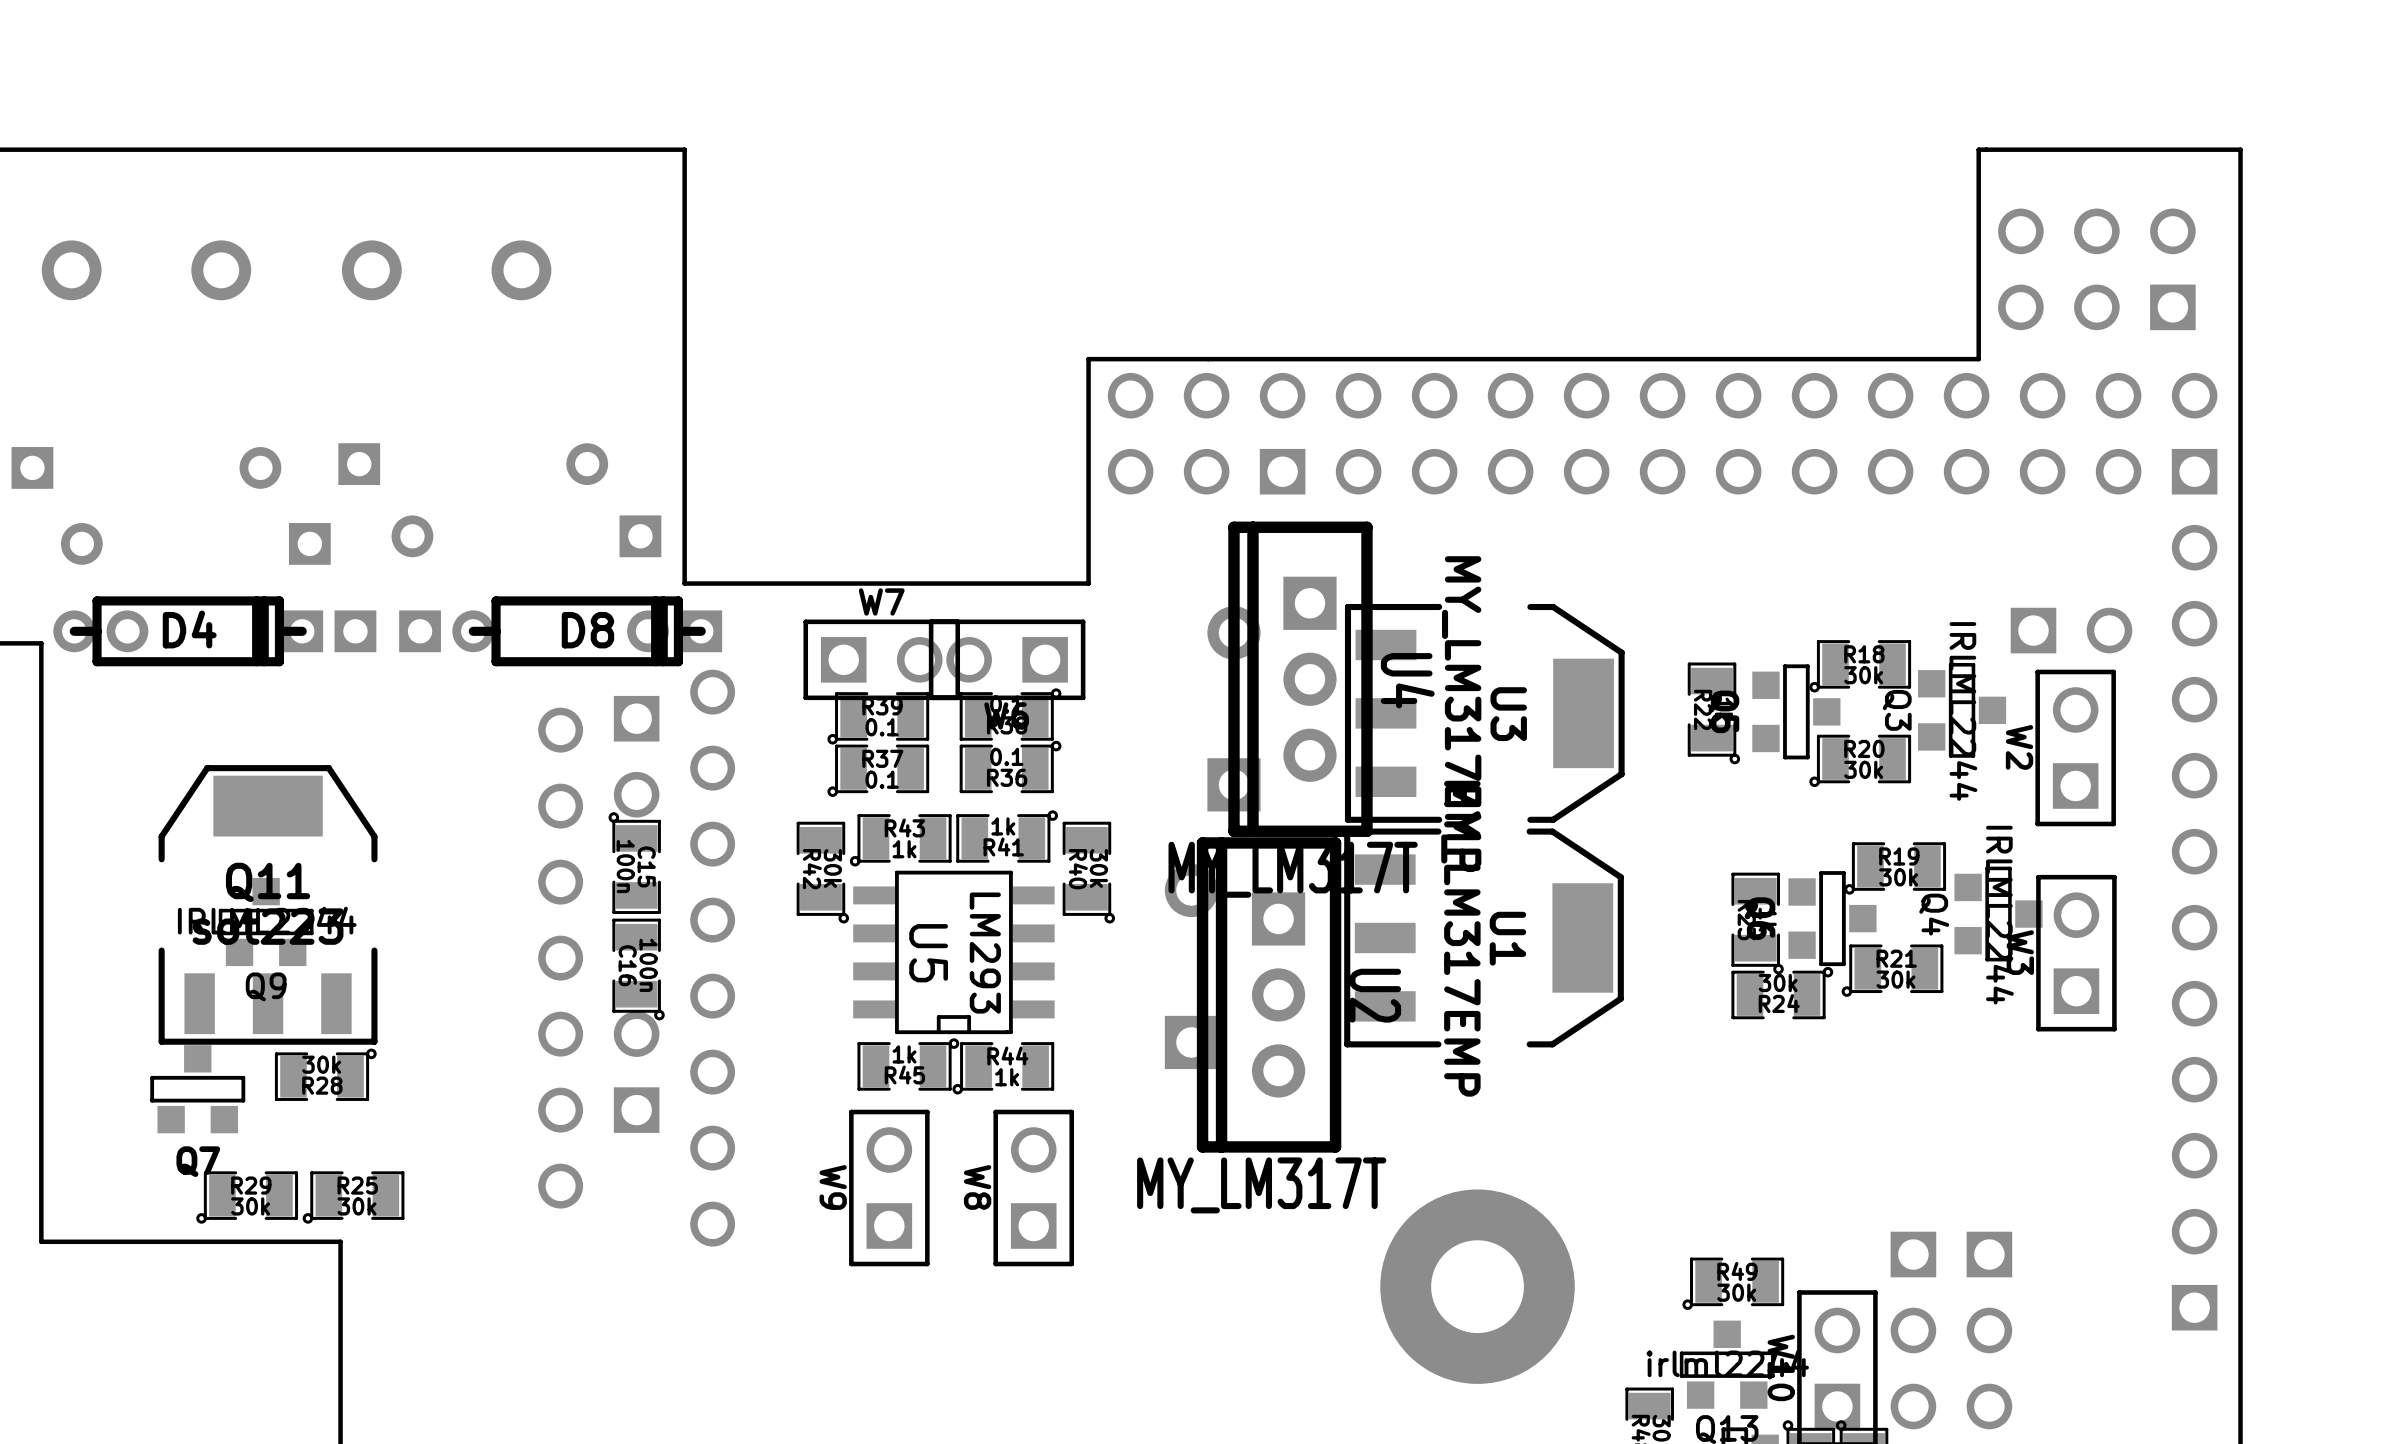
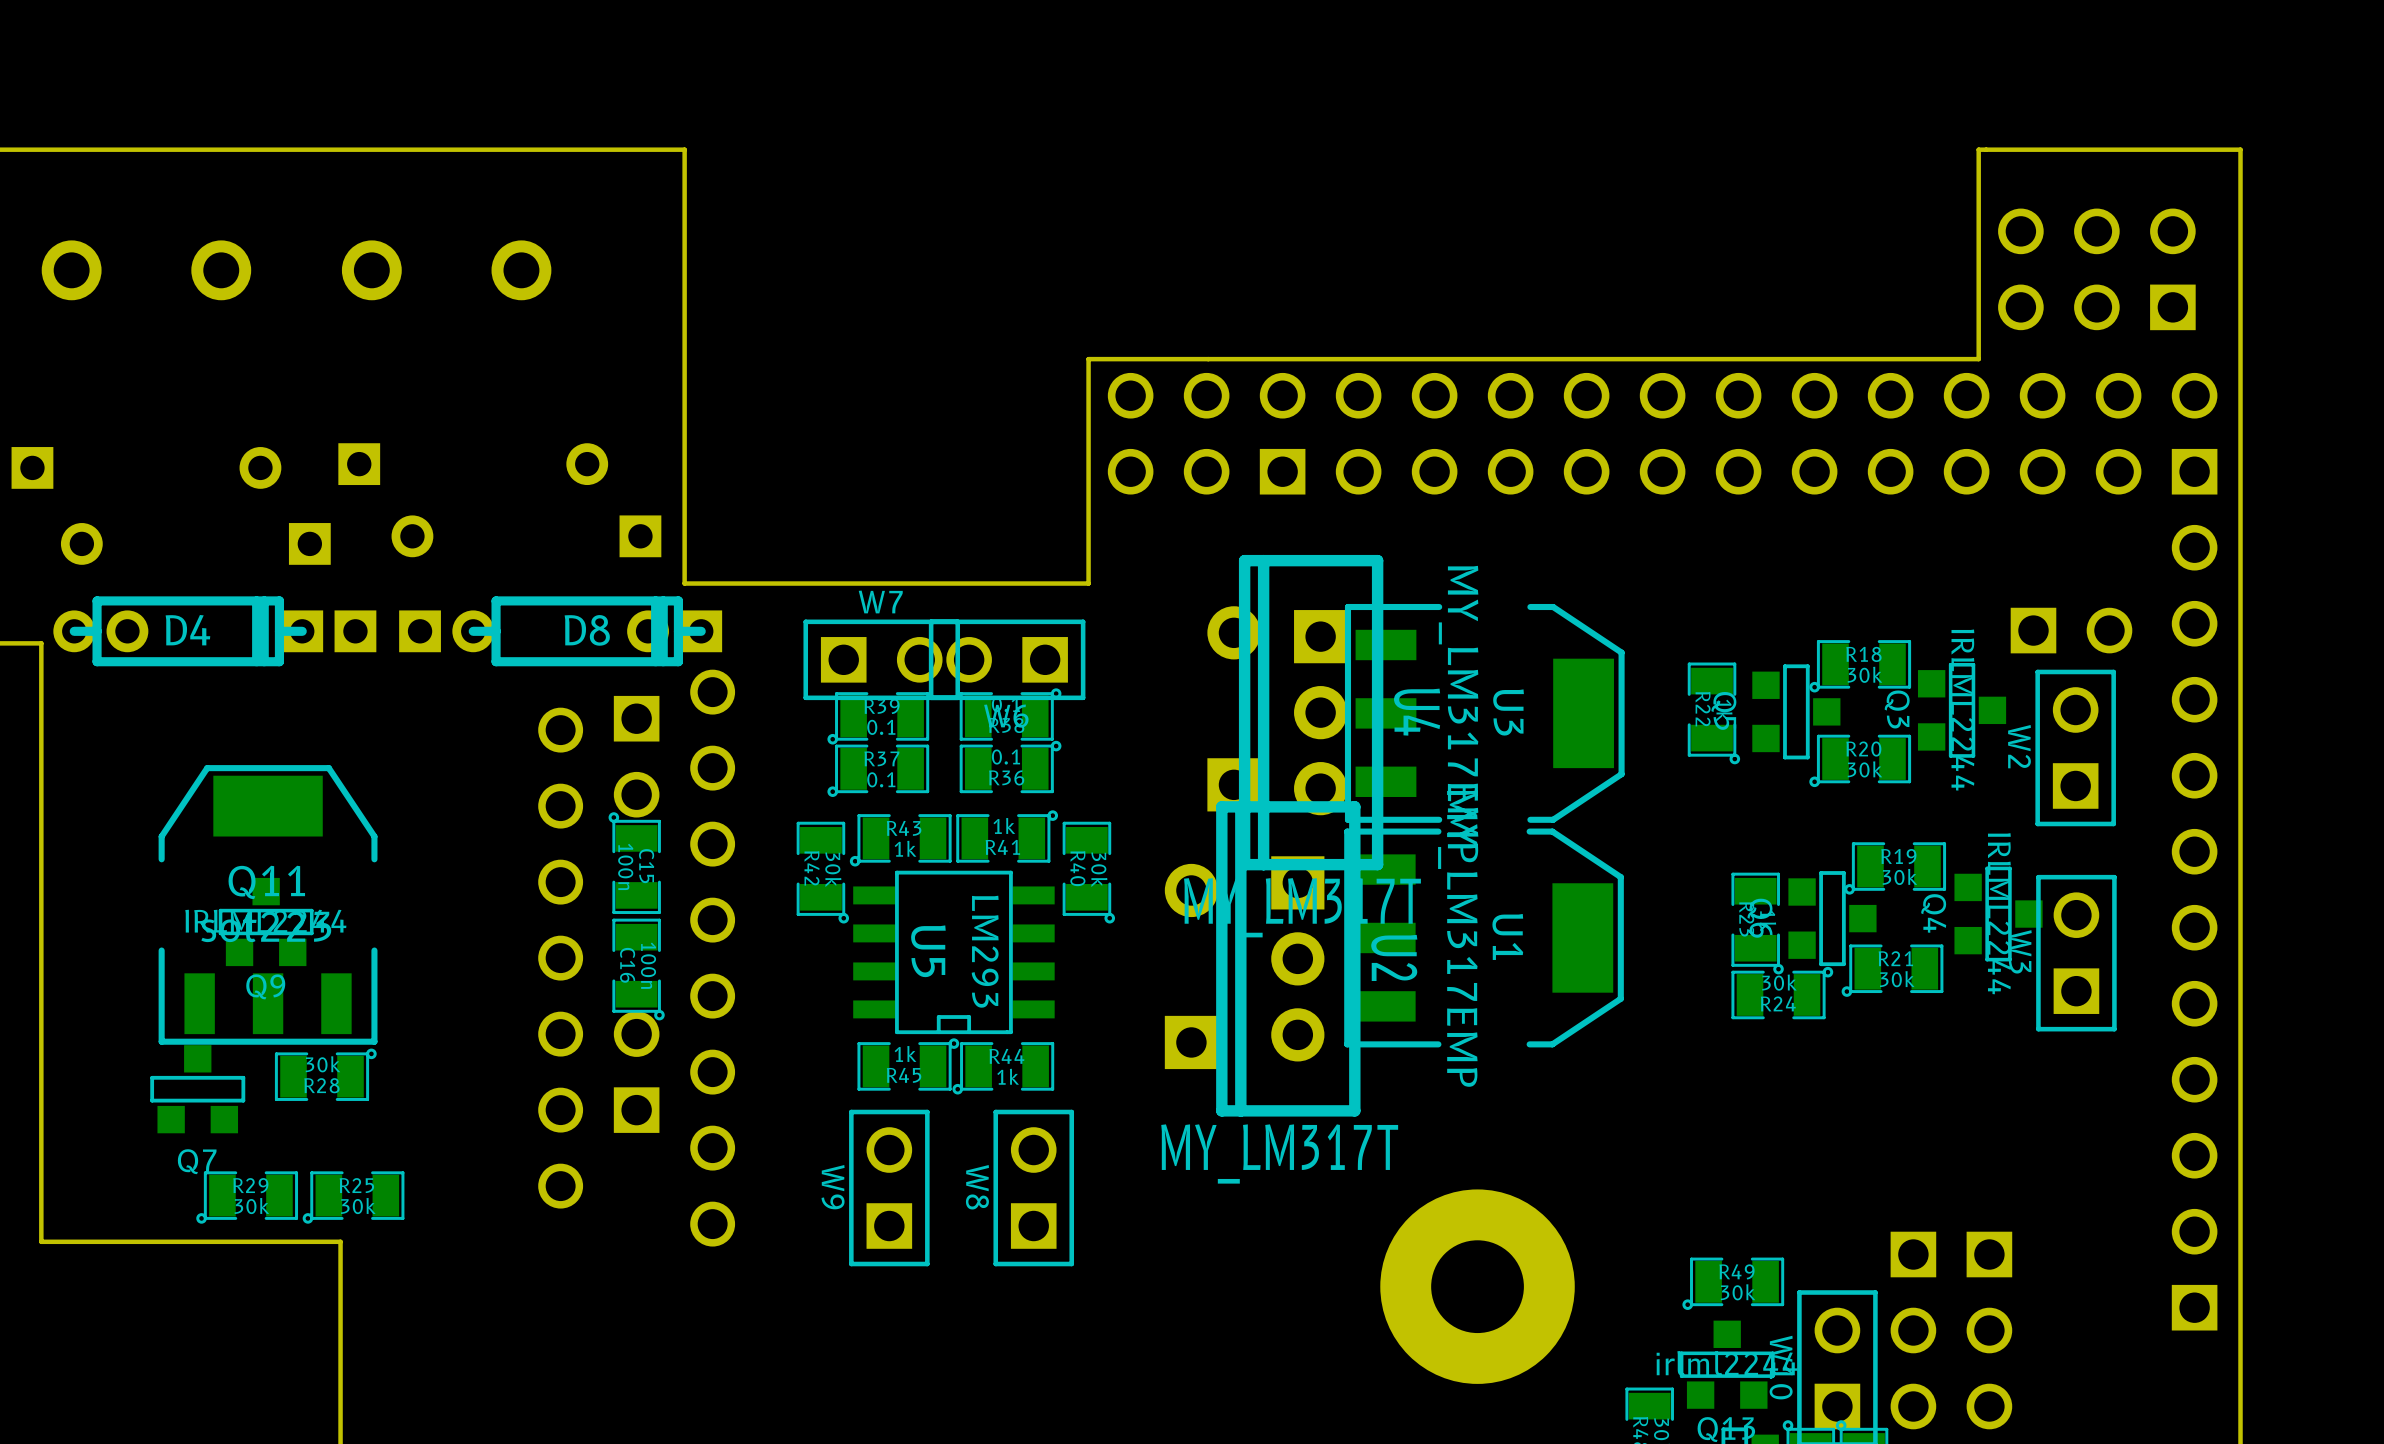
U4 position: (1300, 679) -> (1311, 712)
U2 position: (1269, 994) -> (1288, 958)

